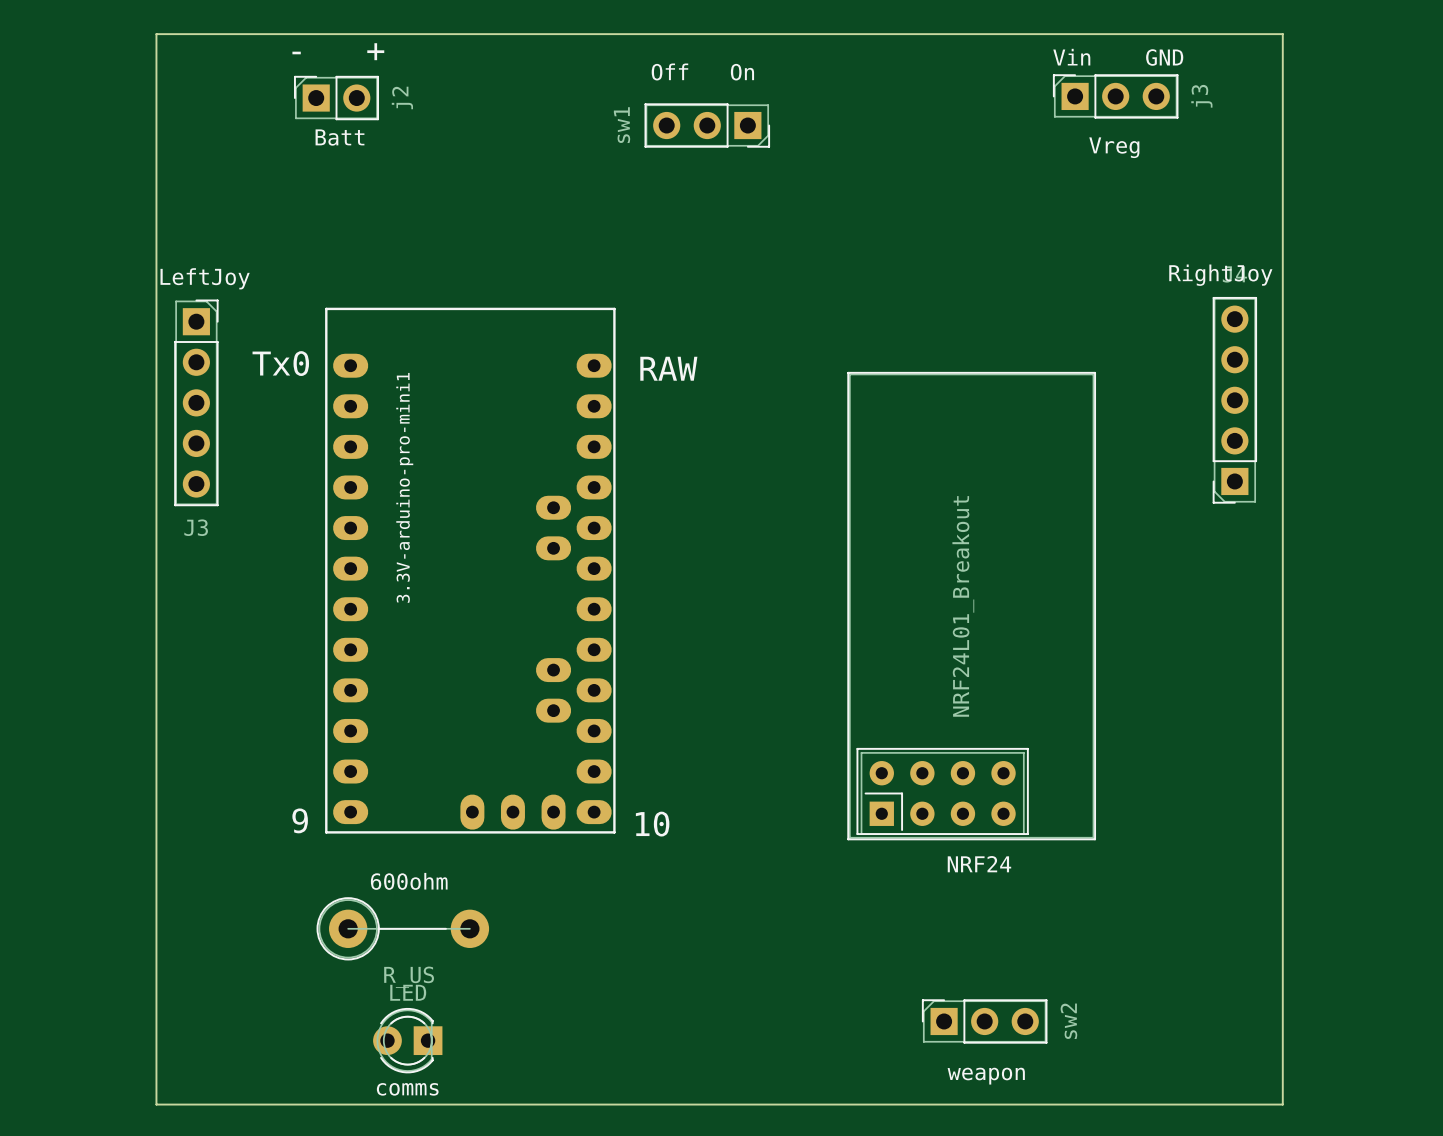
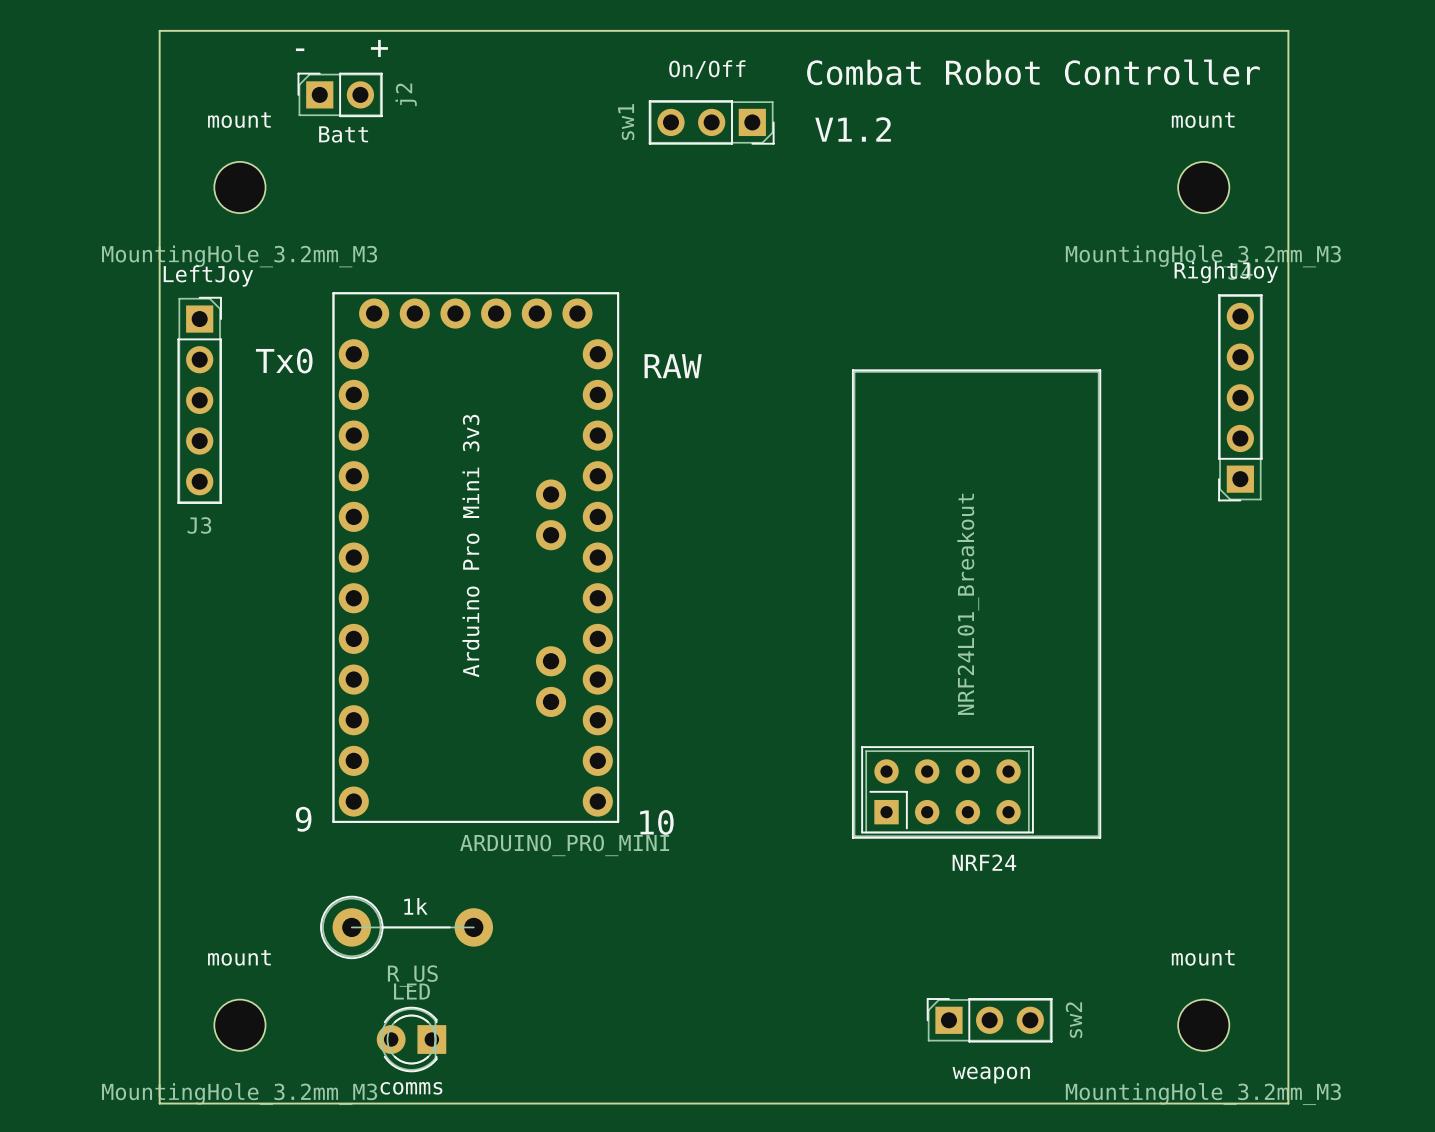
text: Vin GND (1118, 57) -> none
Off On name: Off On (702, 71) -> On/Off (707, 69)
text: none -> Combat Robot Controller (1033, 72)
Vreg: j3 (1115, 96) -> none
text: none -> V1.2 (853, 129)
mount: none -> MountingHole_3.2mm_M3 (239, 187)
mount: none -> MountingHole_3.2mm_M3 (1203, 187)
Arduino Pro Mini 3v3: none -> ARDUINO_PRO_MINI (475, 557)
3.3V-arduino-pro-mini1: (470, 570) -> none
600ohm name: 600ohm (409, 881) -> 1k (415, 906)
mount: none -> MountingHole_3.2mm_M3 (239, 1025)
mount: none -> MountingHole_3.2mm_M3 (1203, 1025)

